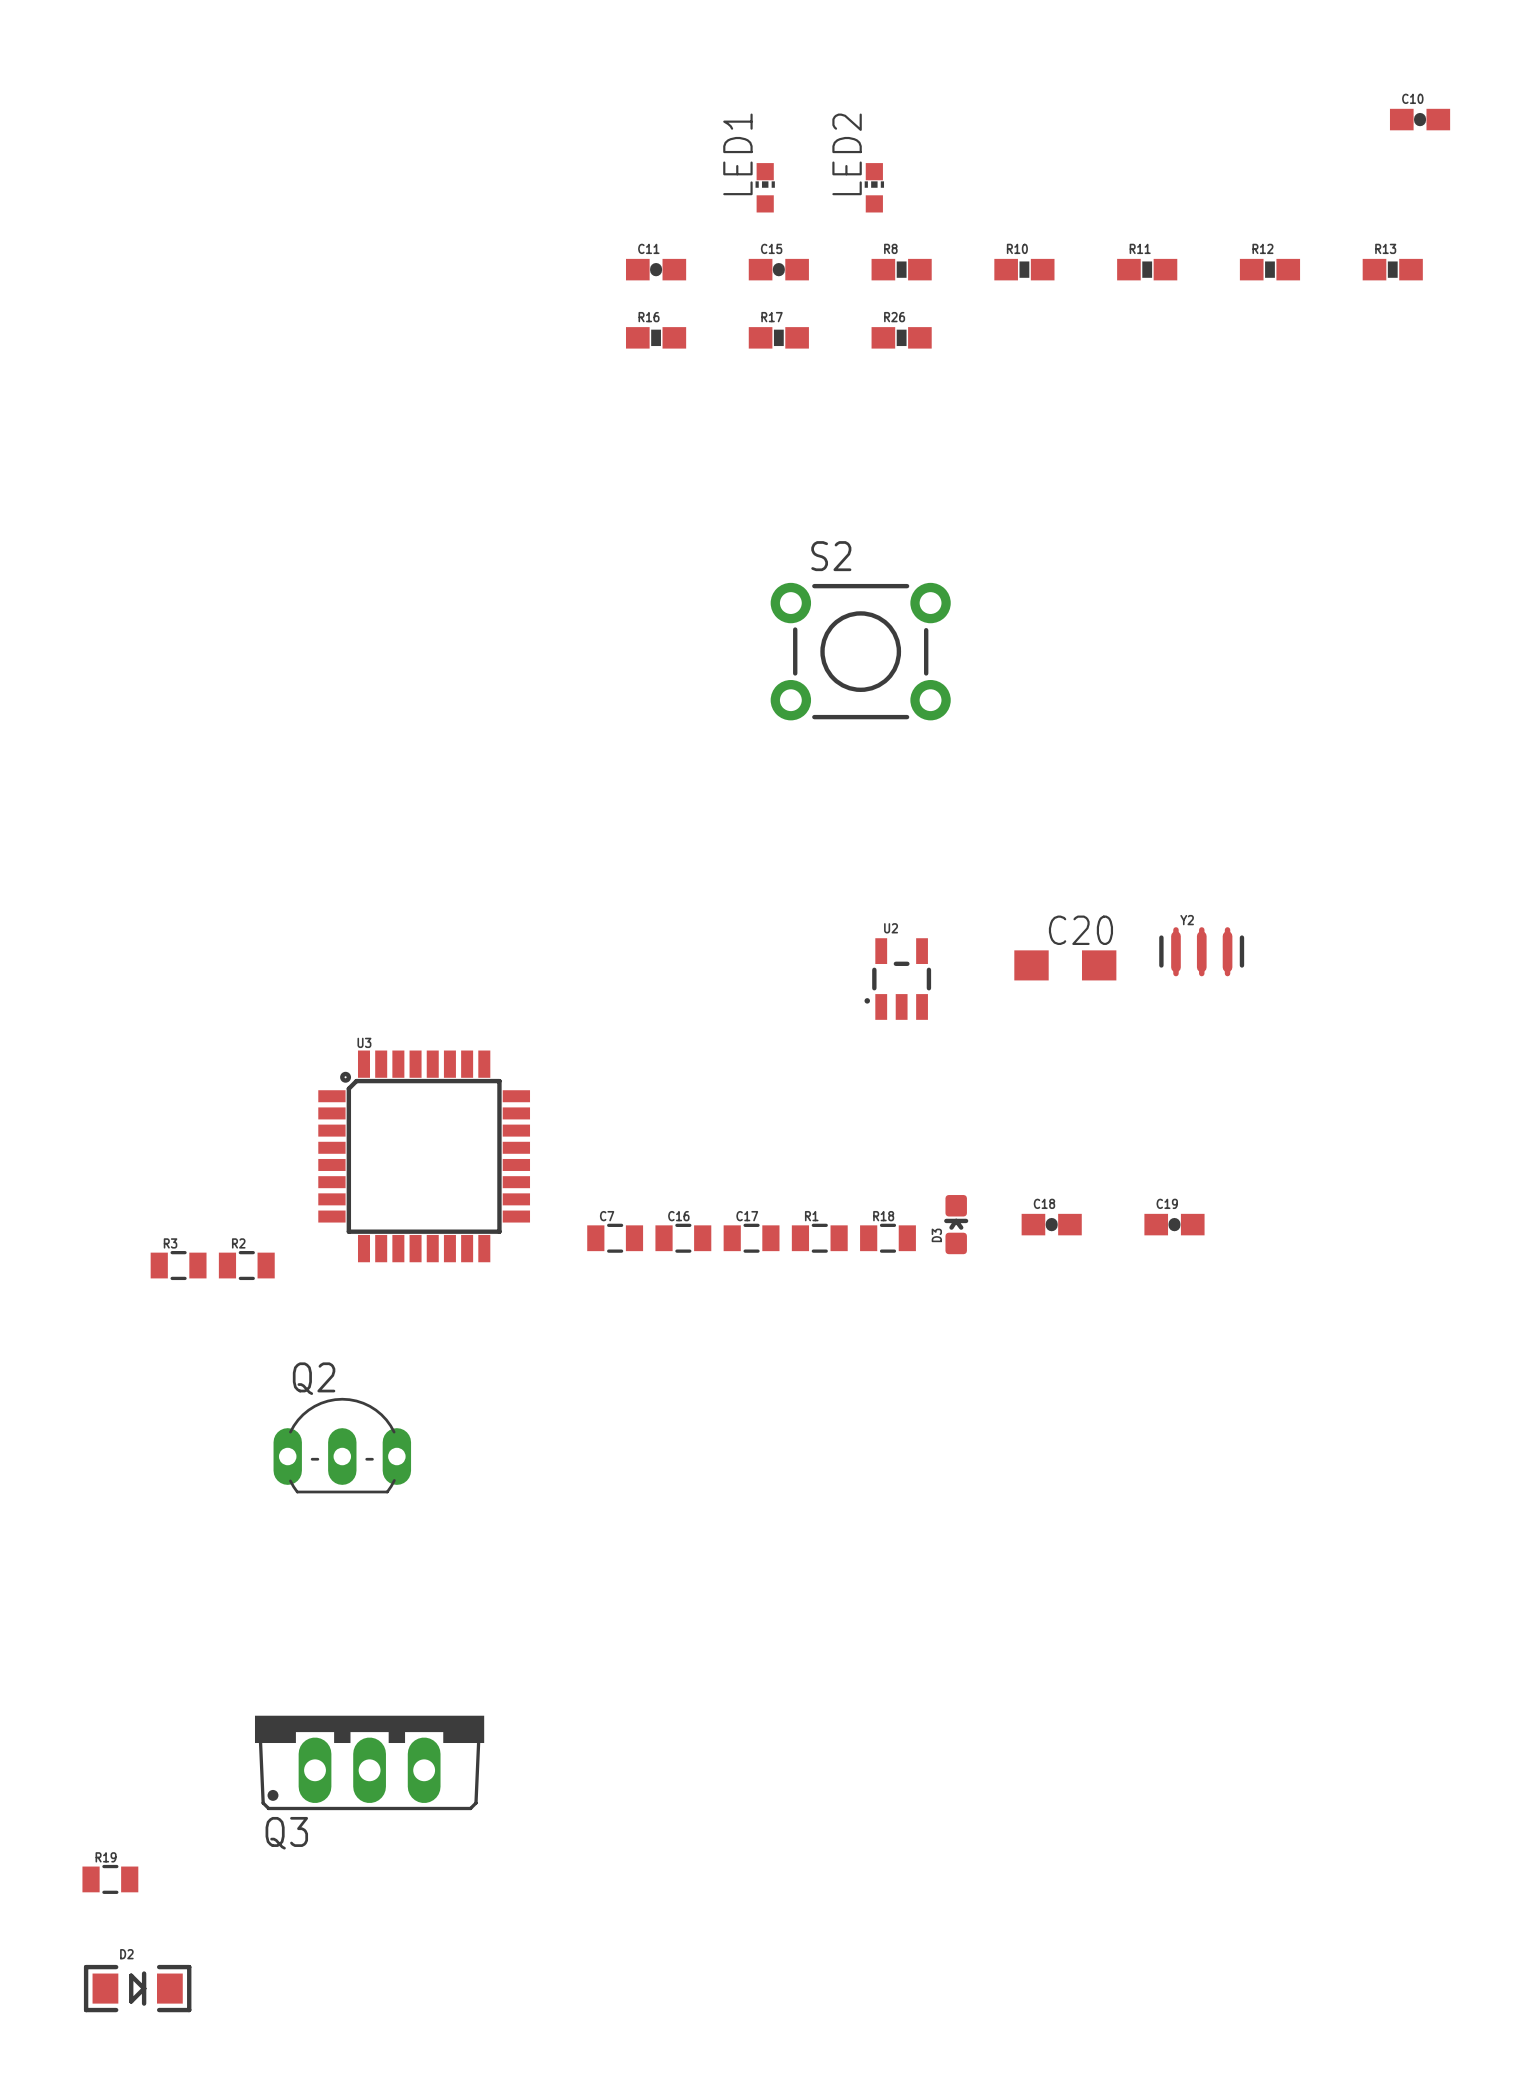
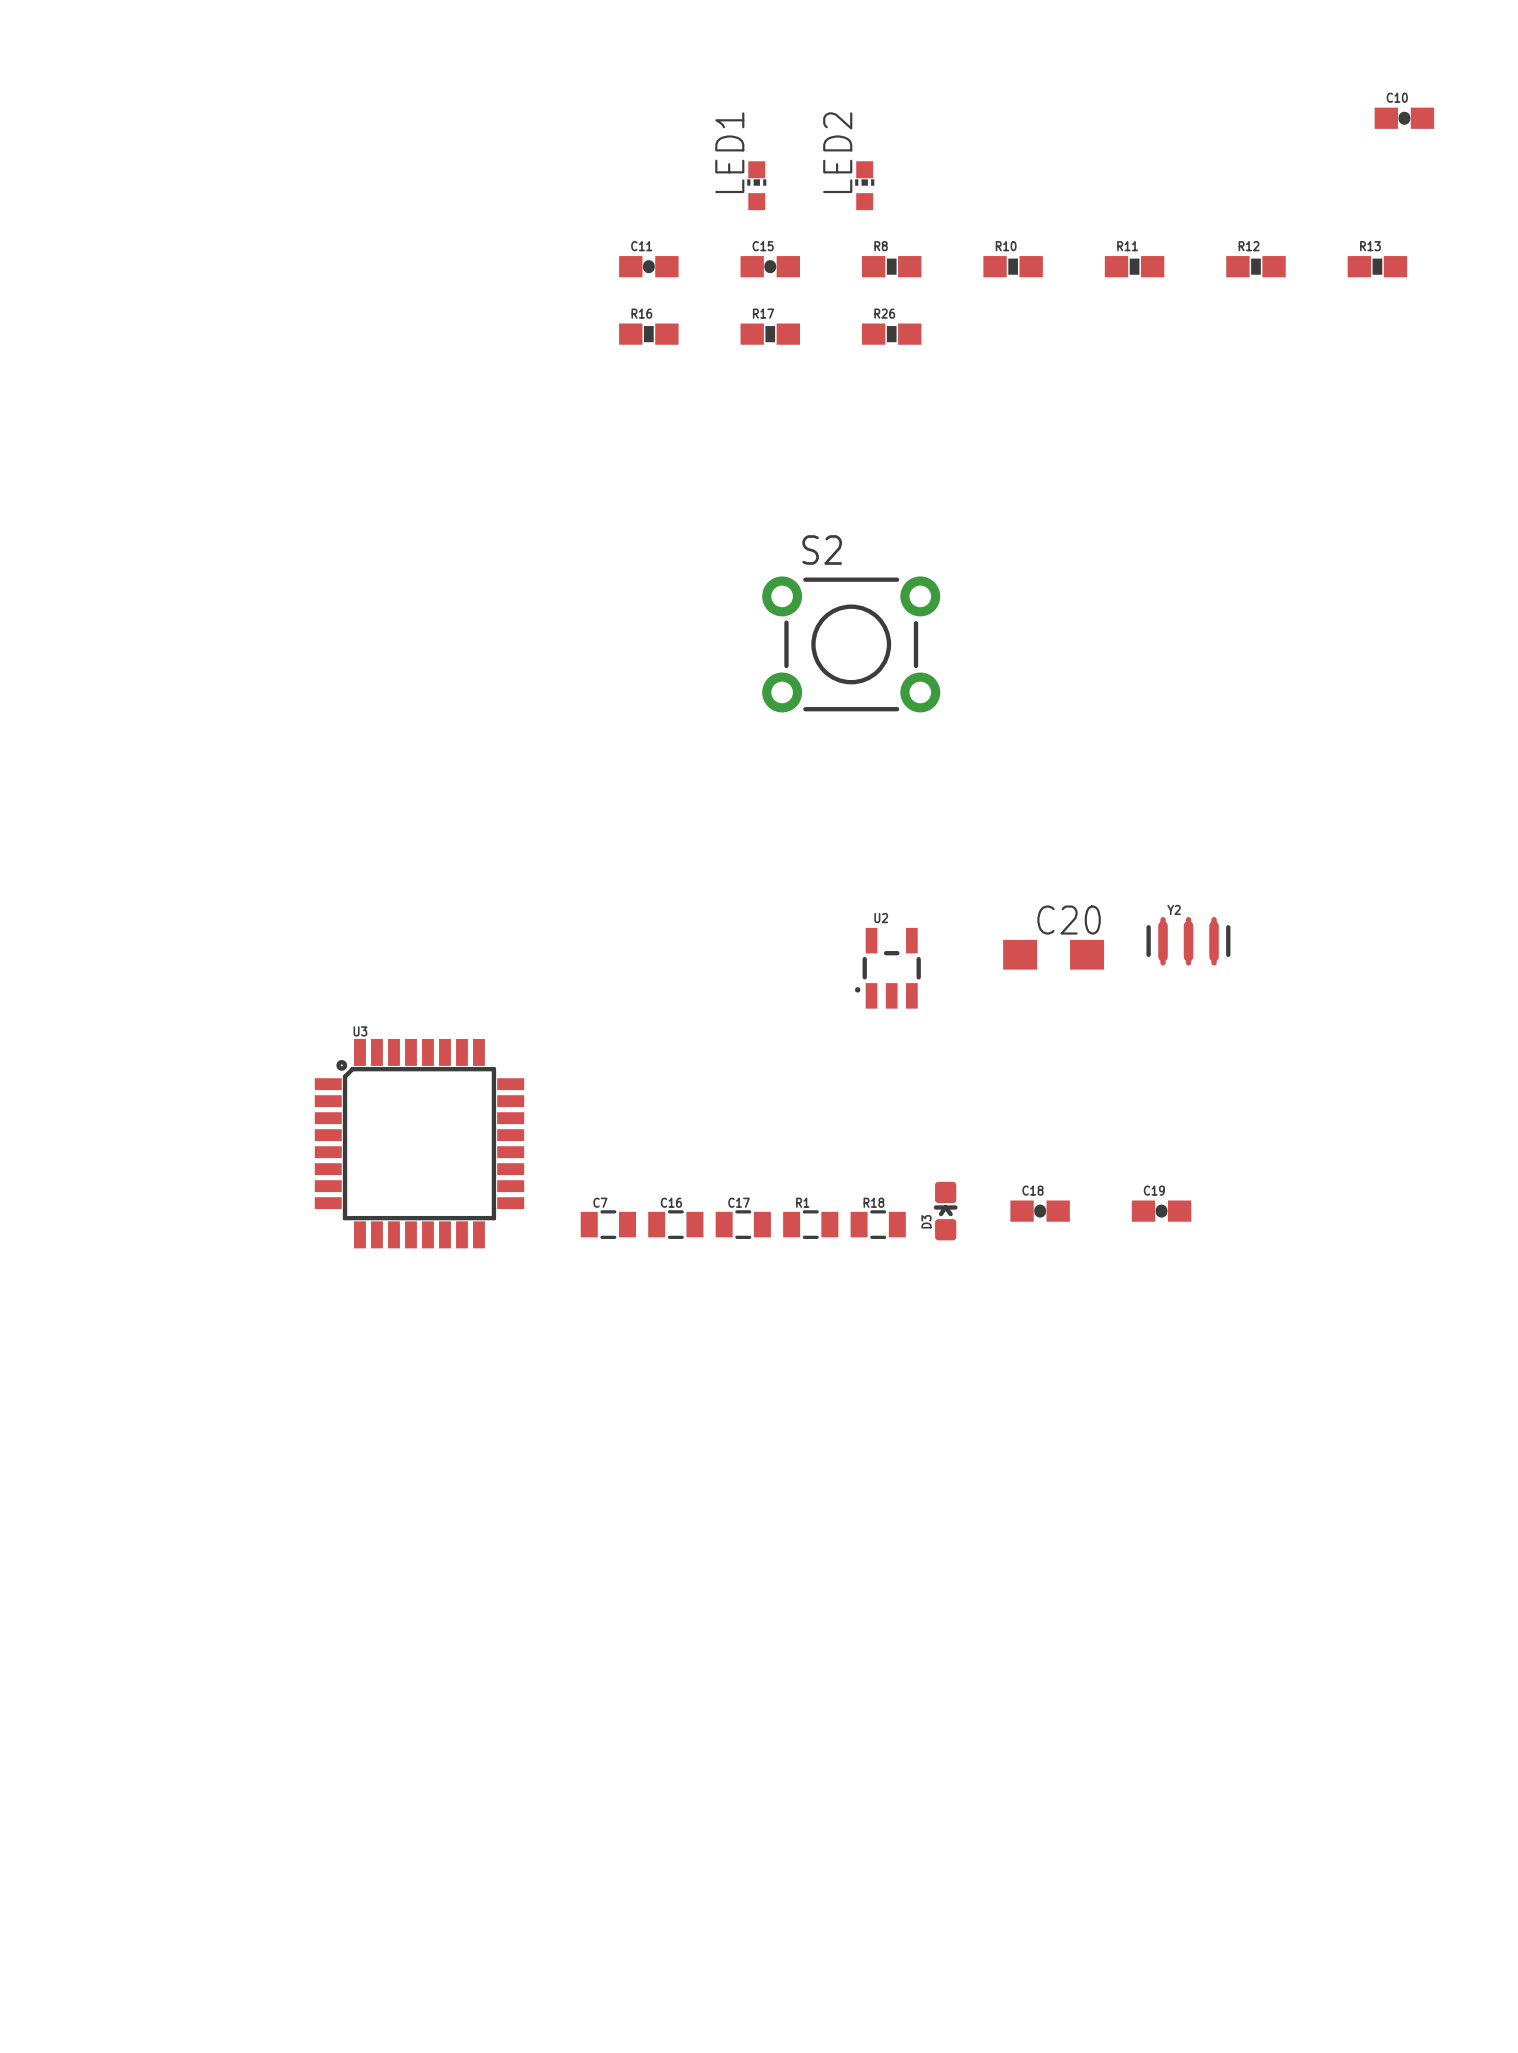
R3: (178, 1265) -> none
R2: (246, 1265) -> none
Q2: (342, 1445) -> none
Q3: (369, 1762) -> none
R19: (110, 1879) -> none
D2: (137, 1988) -> none

